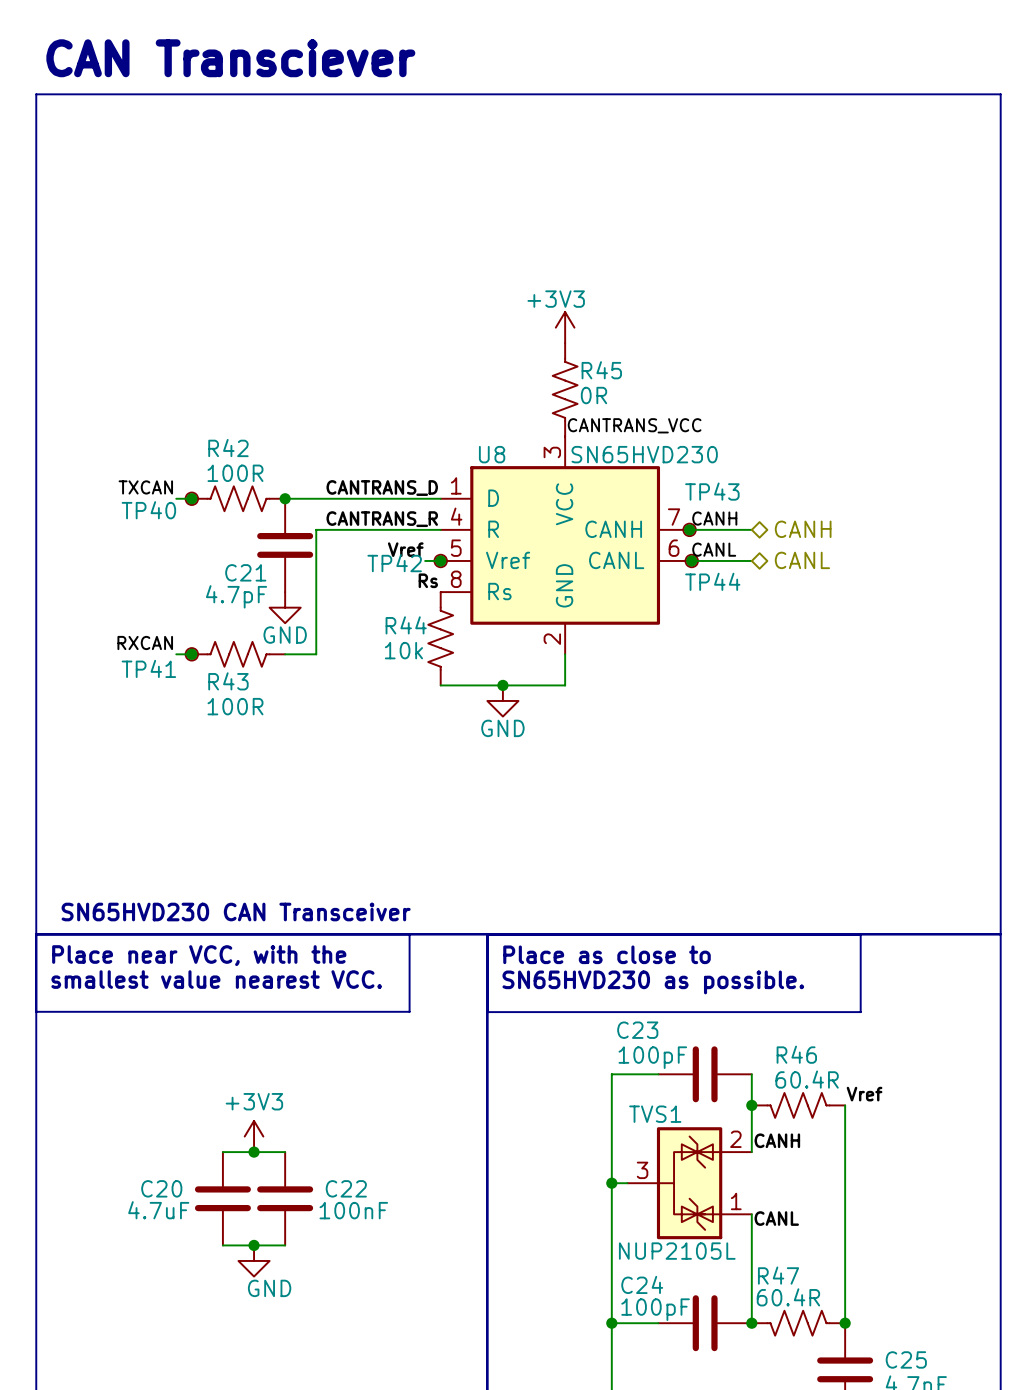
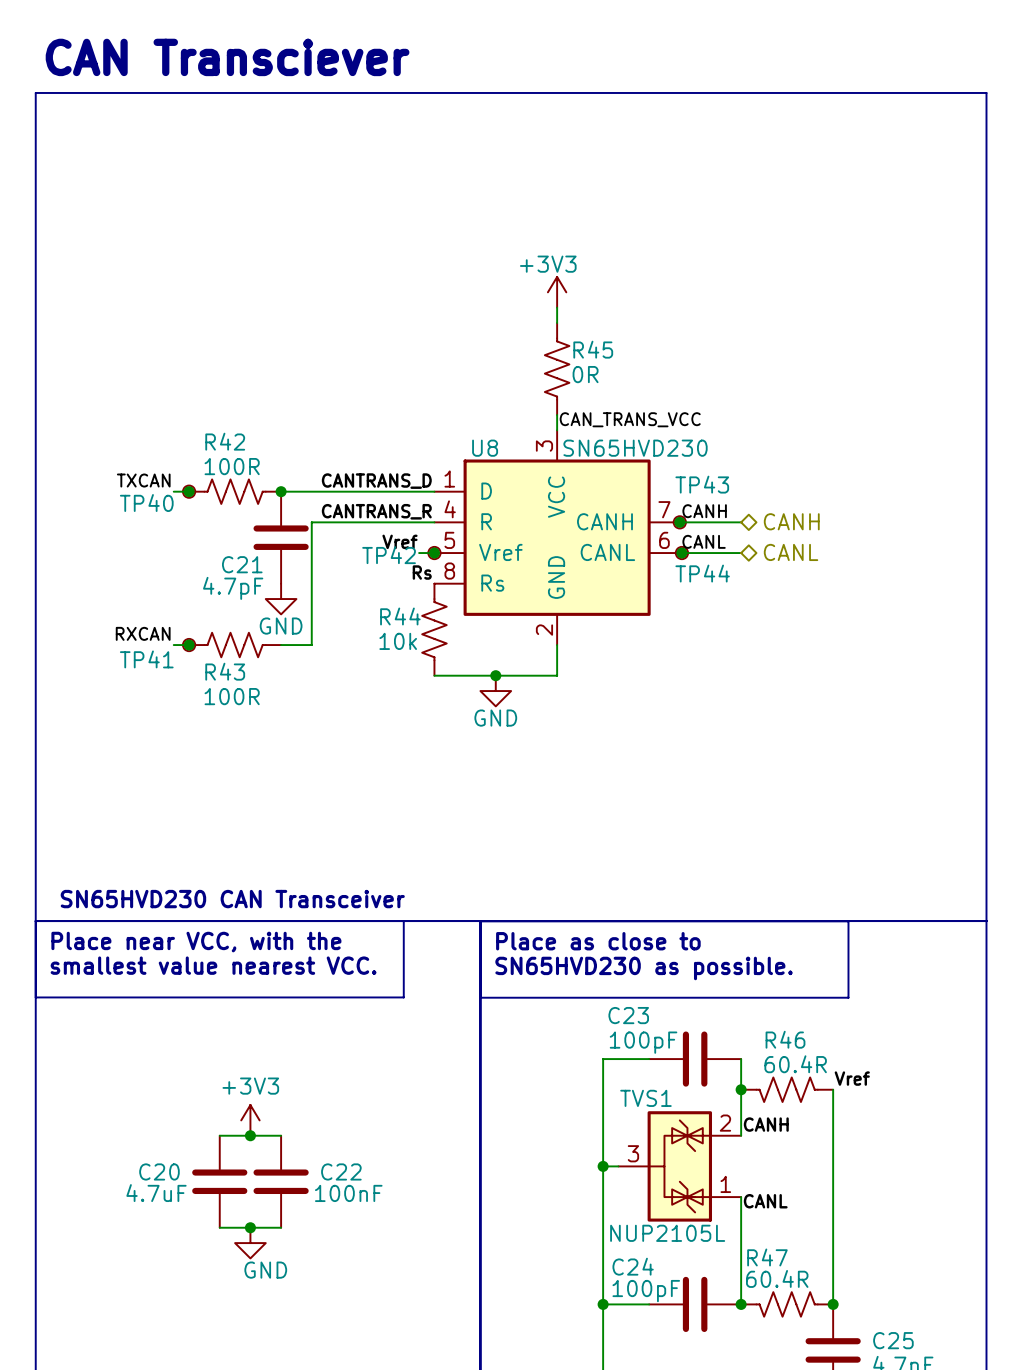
power symbol position: +3V3 (565, 327) -> +3V3 (557, 292)
R45 position: (565, 389) -> (557, 369)
label: CANTRANS_VCC (634, 425) -> CAN_TRANS_VCC (630, 419)

